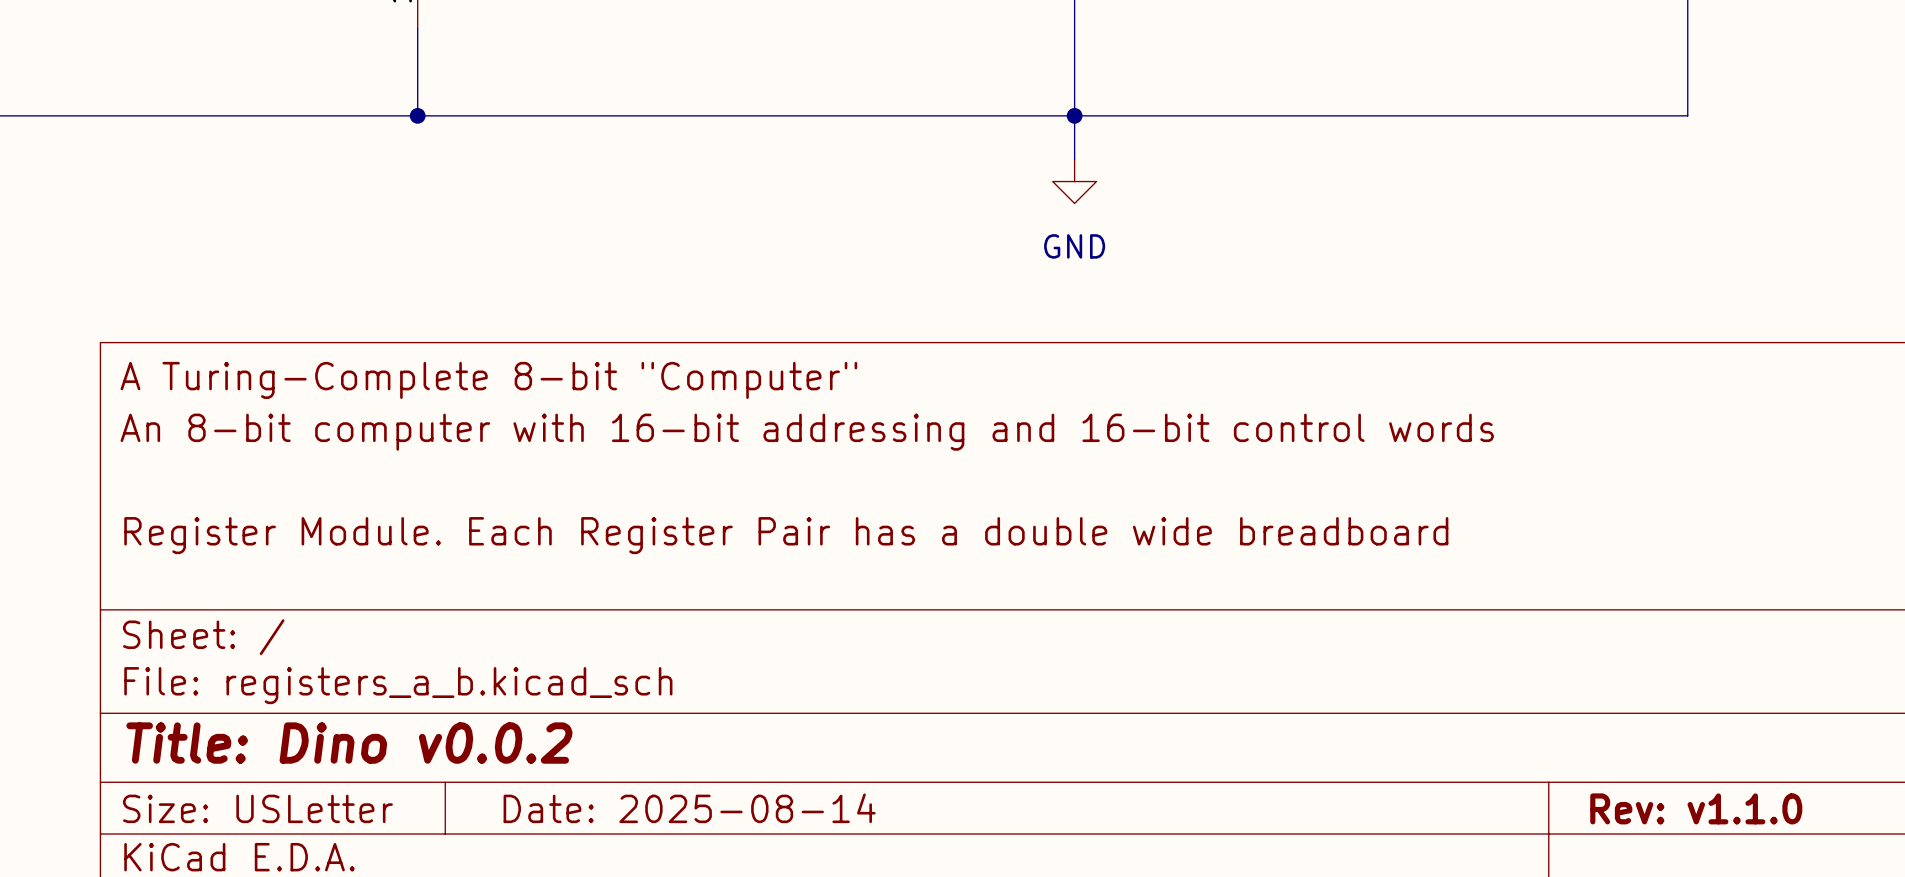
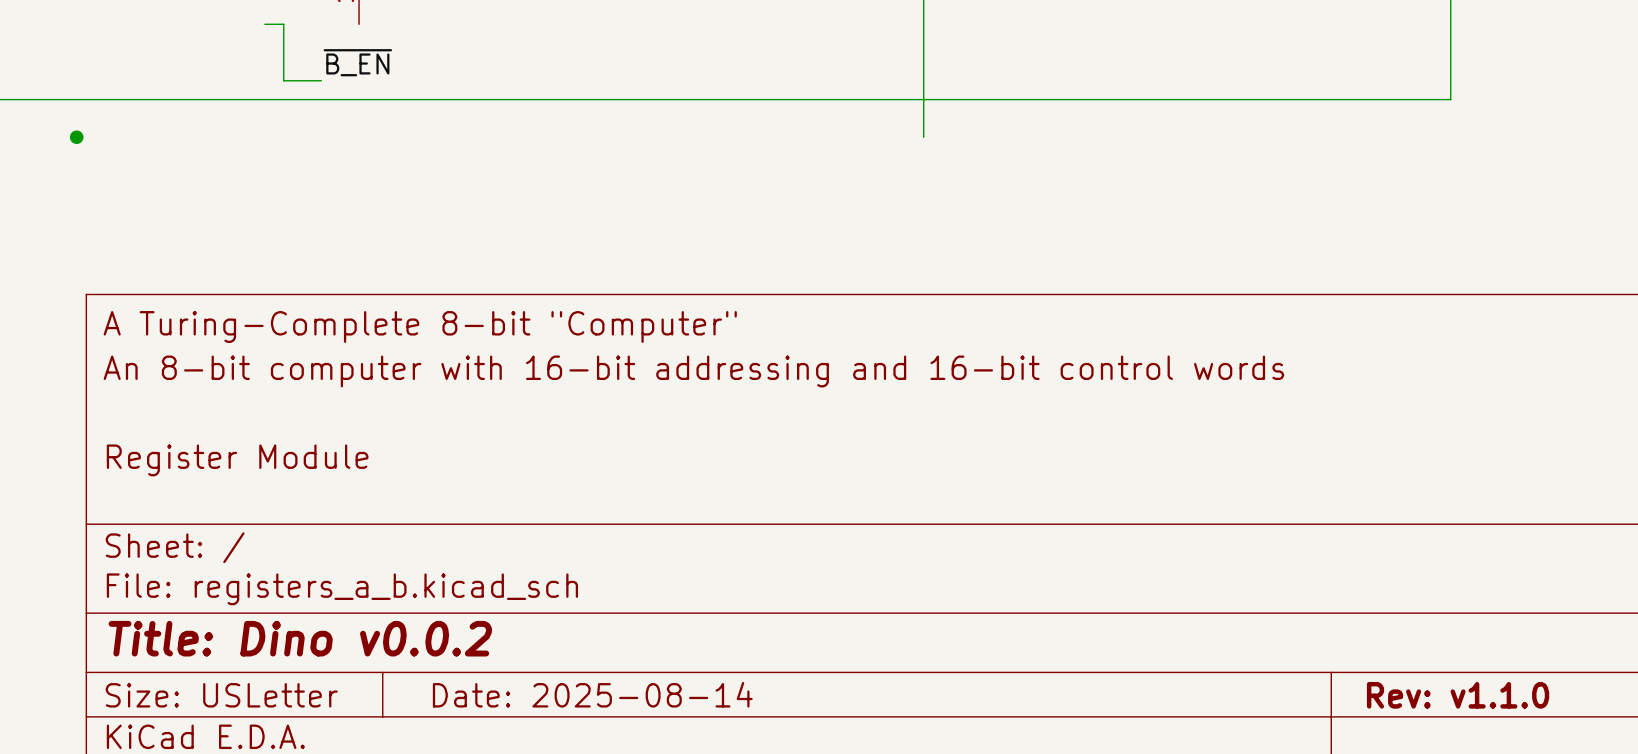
wire: none -> (264, 24) (283, 24) (283, 80) (321, 80)
wire: (417, 28) (417, 115) -> none
label: none -> ~{B_EN} (357, 62)
junction: (417, 115) -> none
junction: (1074, 115) -> none
junction: none -> (76, 137)
power symbol: GND (1074, 181) -> none
title block: Register Module. Each Register Pair has a double wide breadboard (786, 535) -> Register Module (237, 460)

